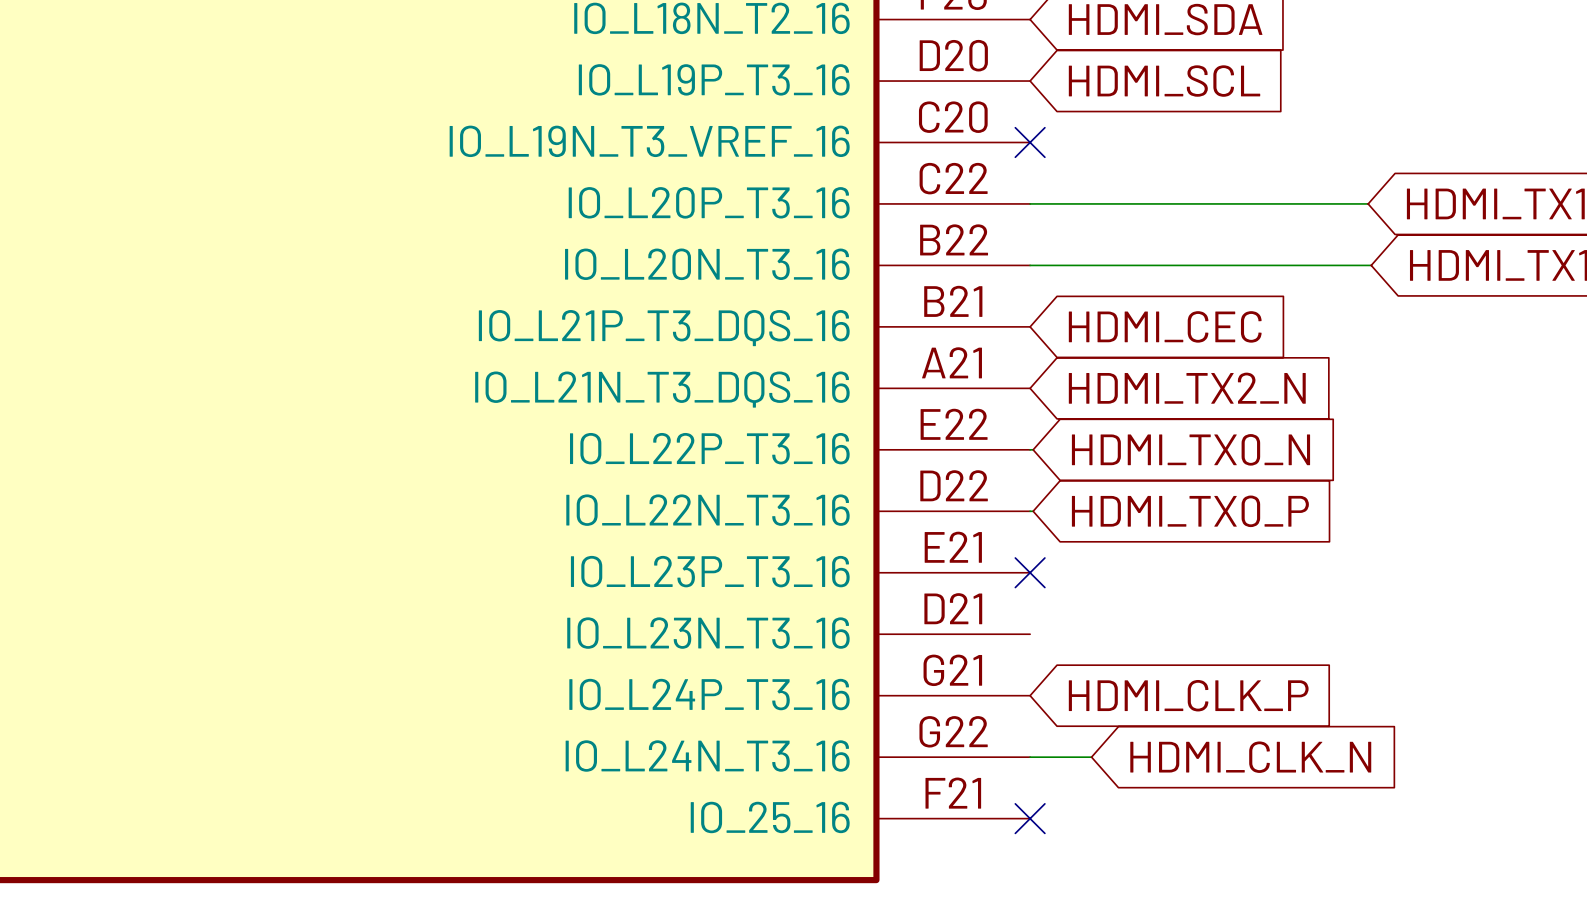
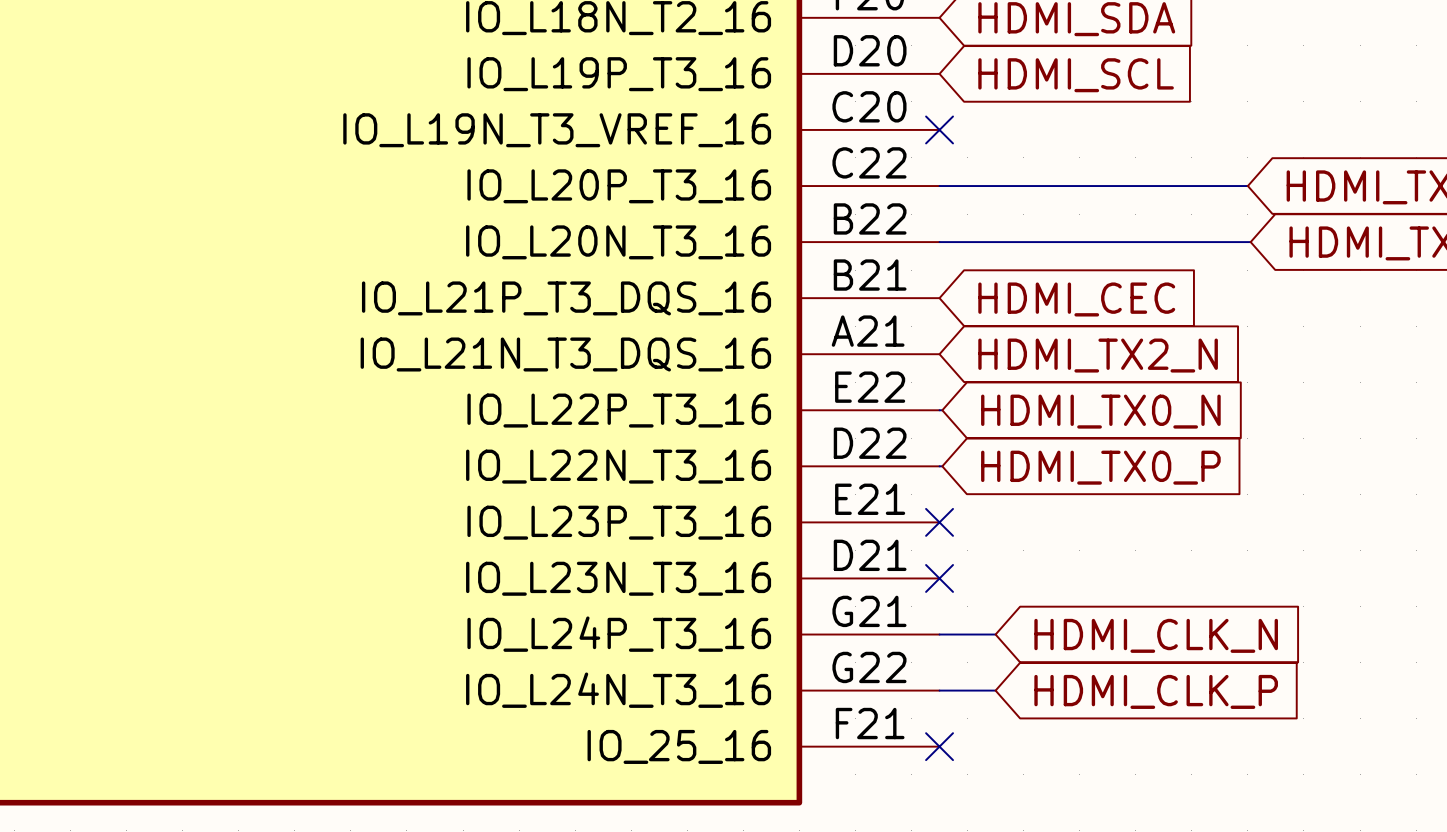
no-connect mark: none -> (939, 578)
wire: none -> (939, 634) (995, 634)
global label: HDMI_CLK_P (1188, 695) -> HDMI_CLK_N (1156, 635)
global label: HDMI_CLK_N (1250, 757) -> HDMI_CLK_P (1156, 691)

